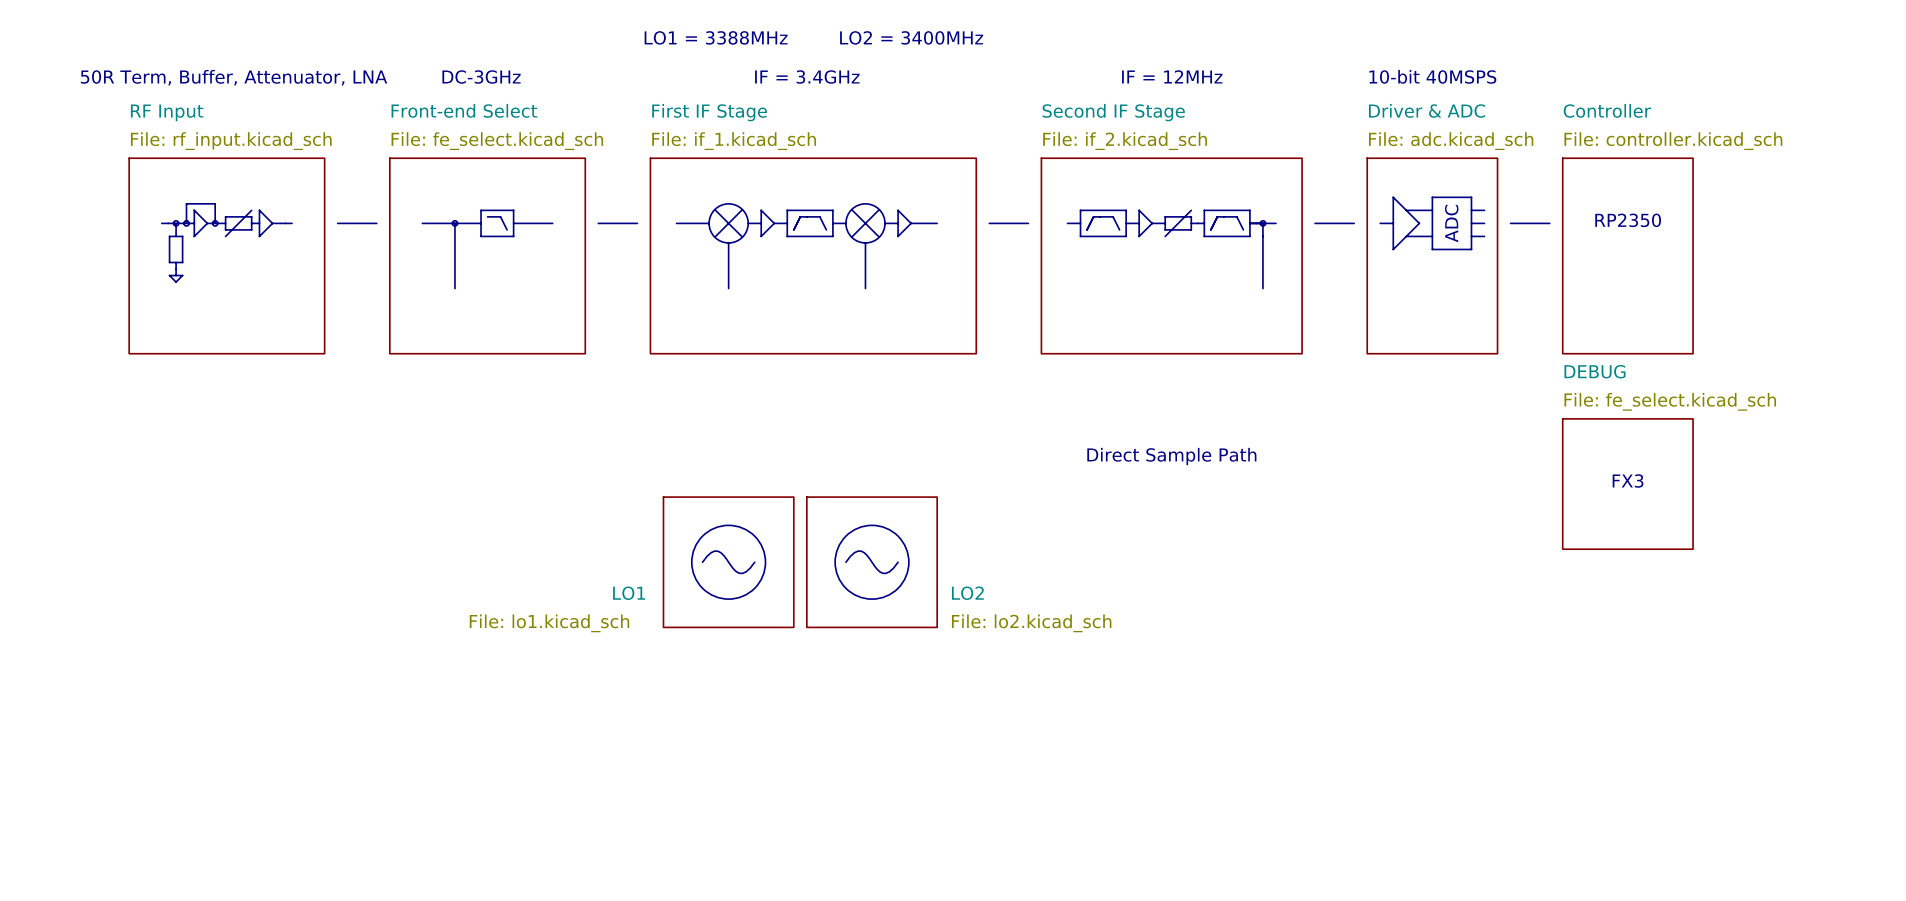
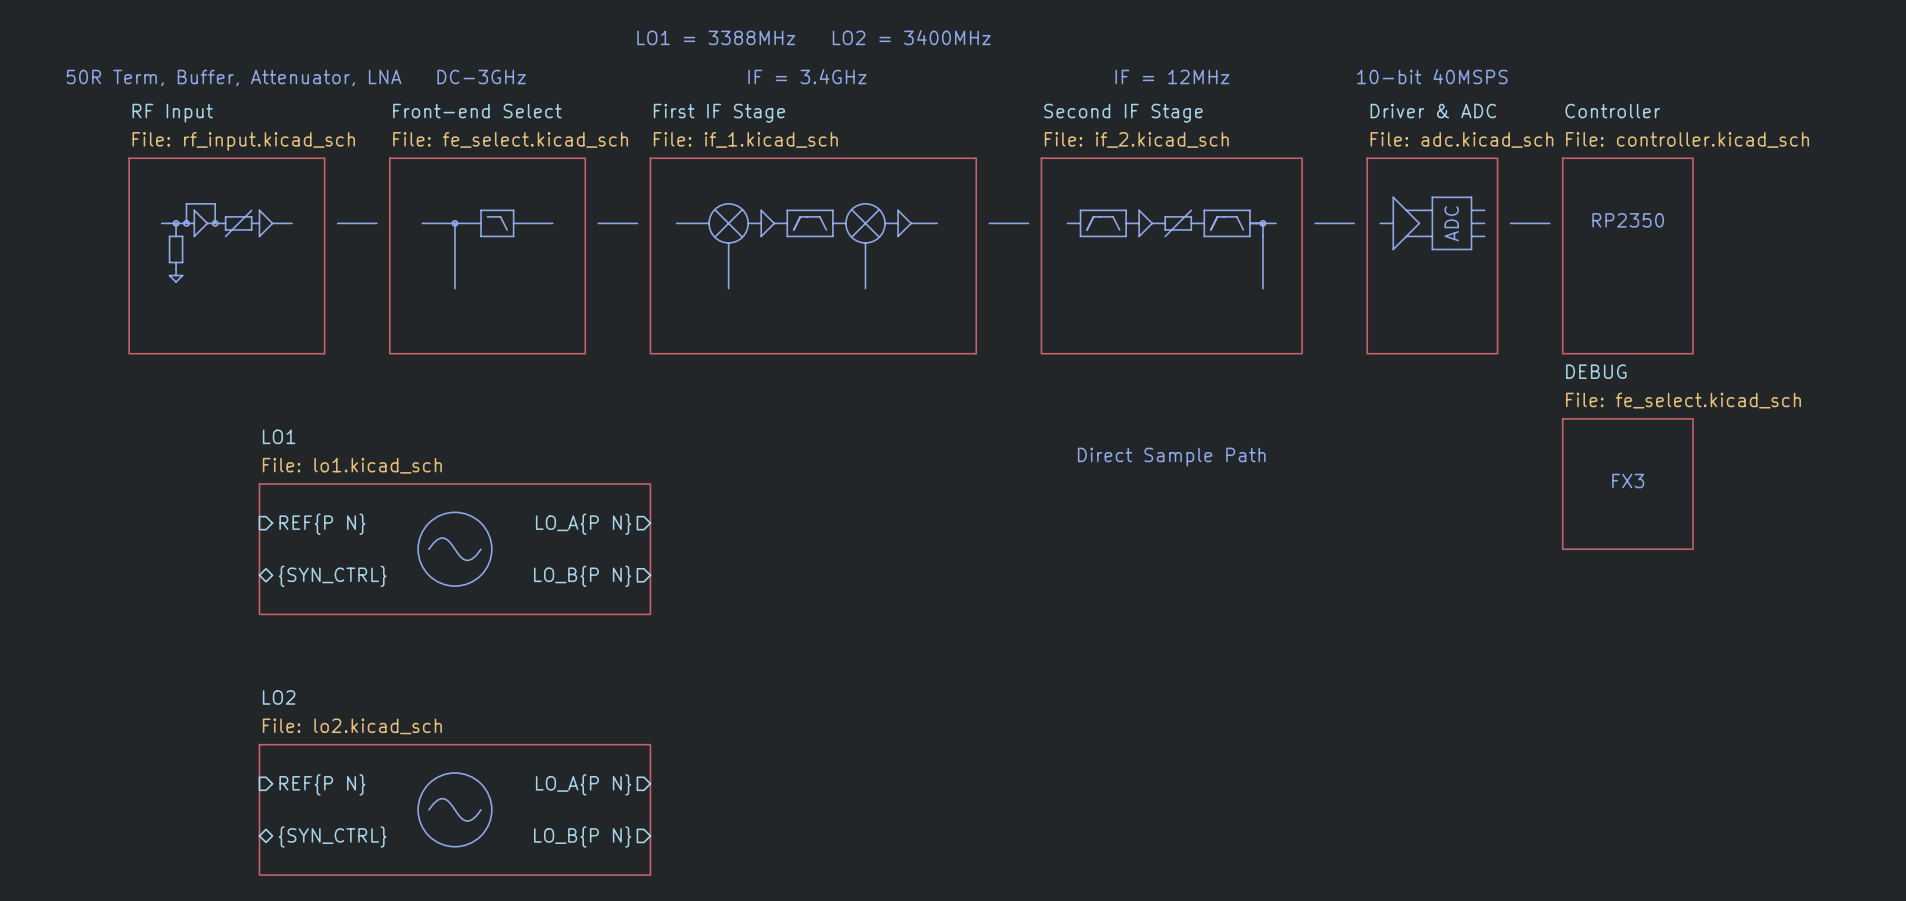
sheet LO1 shape: [662, 496, 795, 629] -> [258, 483, 652, 616]
sheet LO2 shape: [806, 496, 938, 629] -> [258, 743, 652, 876]
drawing: none -> [418, 512, 492, 587]
sheet pin: none -> REF{P N} (322, 524)
sheet pin: none -> LO_A{P N} (583, 524)
drawing: [691, 525, 766, 600] -> none
drawing: [835, 525, 909, 600] -> none
line: none -> (428, 549) (441, 538) (447, 539) (465, 560) (472, 558) (481, 549)
line: (702, 562) (714, 551) (720, 552) (739, 573) (746, 571) (754, 562) -> none
line: (845, 562) (858, 551) (864, 552) (882, 573) (889, 571) (898, 562) -> none
sheet pin: none -> {SYN_CTRL} (332, 576)
sheet pin: none -> LO_B{P N} (582, 576)
sheet LO1 name position: LO1 (629, 593) -> LO1 (279, 436)
sheet LO2 name position: LO2 (967, 593) -> LO2 (279, 697)
sheet LO1 value position: File: lo1.kicad_sch (549, 623) -> File: lo1.kicad_sch (352, 465)
sheet LO2 value position: File: lo2.kicad_sch (1031, 623) -> File: lo2.kicad_sch (352, 726)
drawing: none -> [418, 772, 492, 847]
sheet pin: none -> REF{P N} (322, 784)
sheet pin: none -> LO_A{P N} (583, 784)
line: none -> (428, 809) (441, 798) (447, 800) (465, 820) (472, 819) (481, 809)
sheet pin: none -> {SYN_CTRL} (332, 836)
sheet pin: none -> LO_B{P N} (582, 836)

